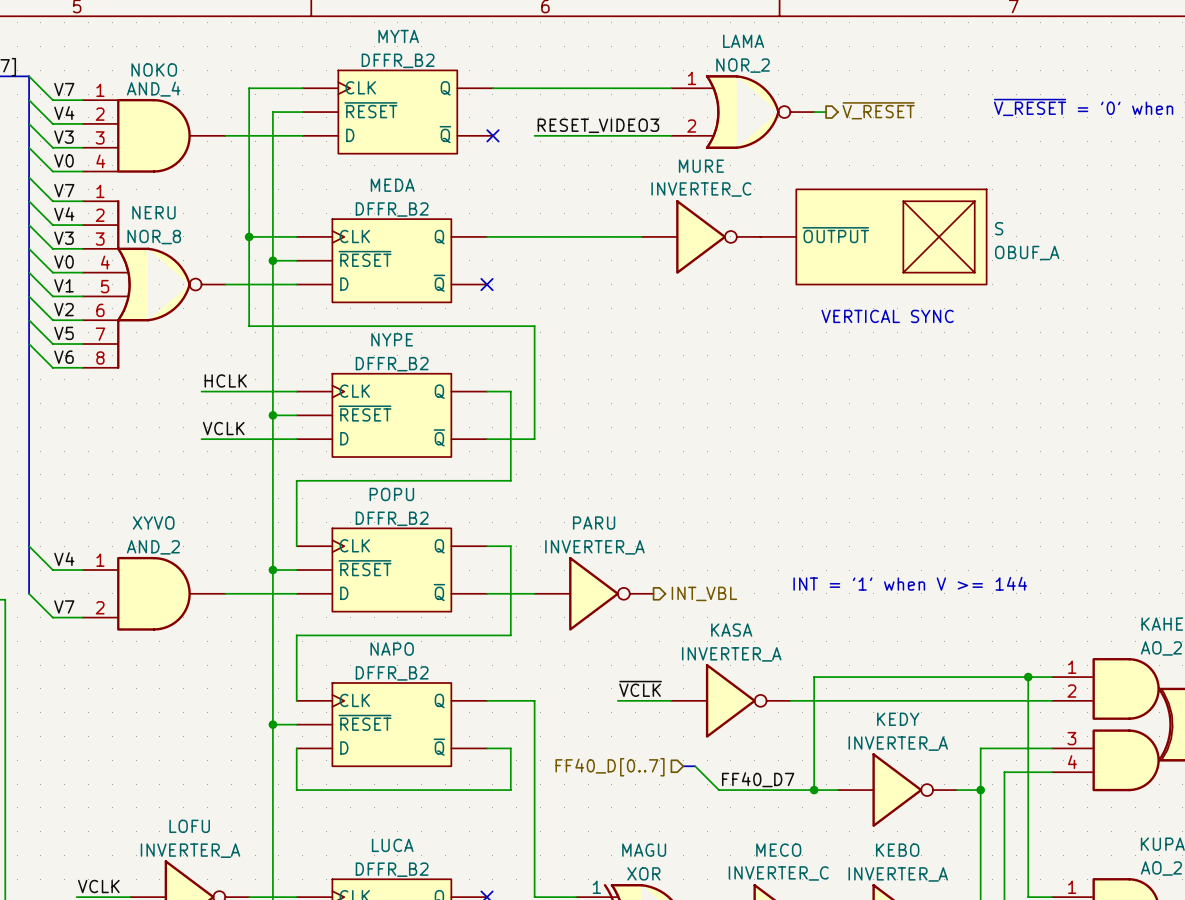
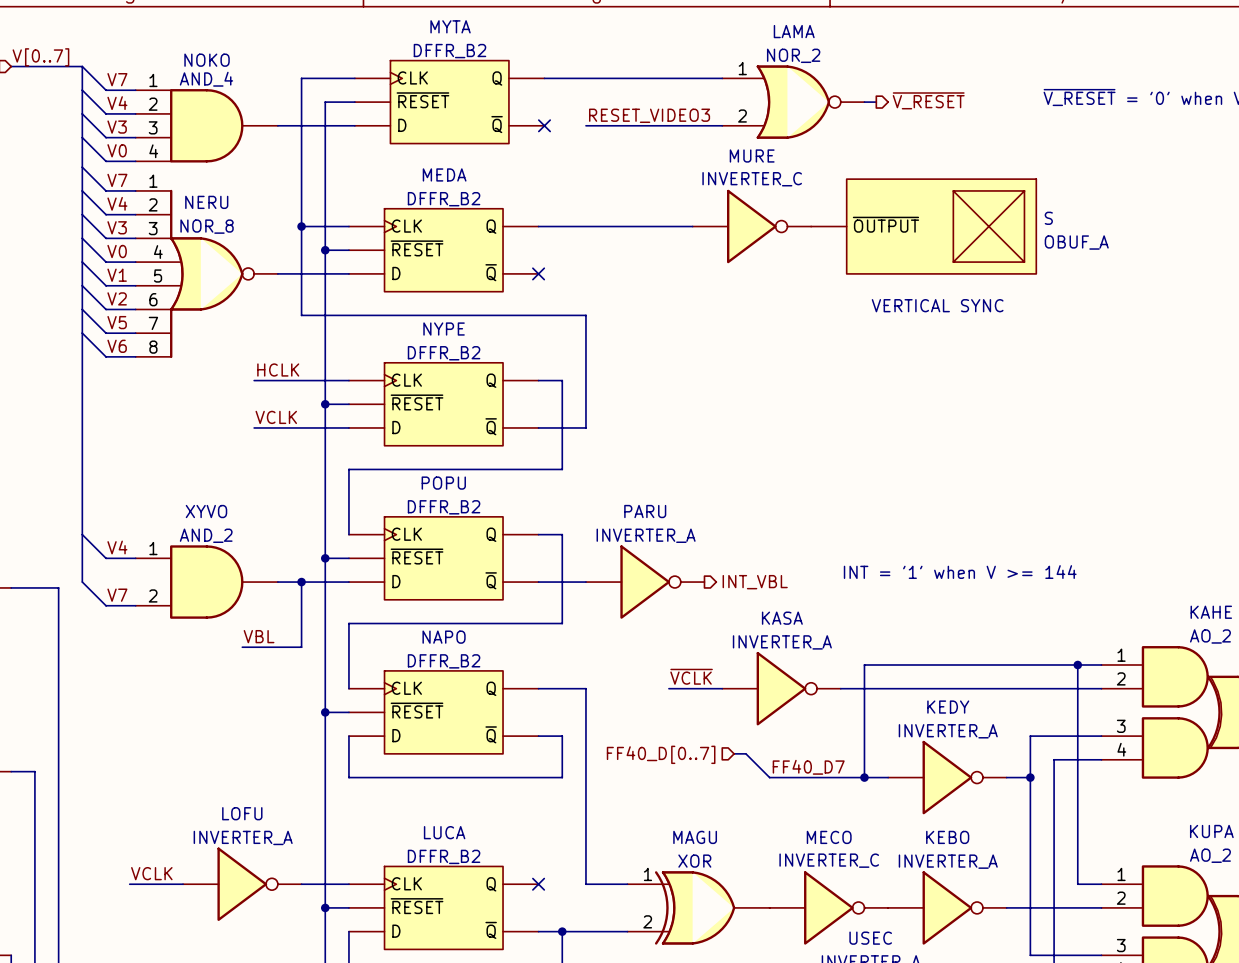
wire: none -> (301, 582) (301, 647) (242, 647)
junction: none -> (301, 582)
label: none -> VBL (259, 636)

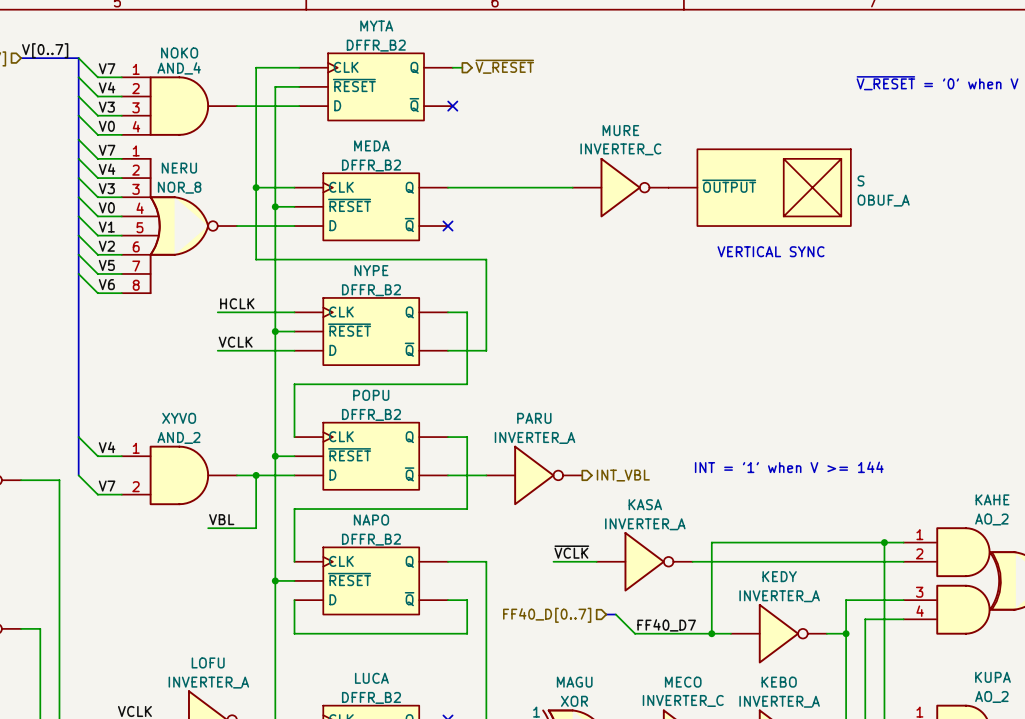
hierarchical label: none -> ~{V_RESET} (504, 66)
wire: (556, 78) (722, 78) -> none
hierarchical label: ~{V_RESET} (928, 100) -> none
LAMA: NOR_2 (793, 102) -> none
wire: (864, 102) (876, 102) -> none
label: RESET_VIDEO3 (649, 115) -> none
wire: (585, 125) (722, 125) -> none

